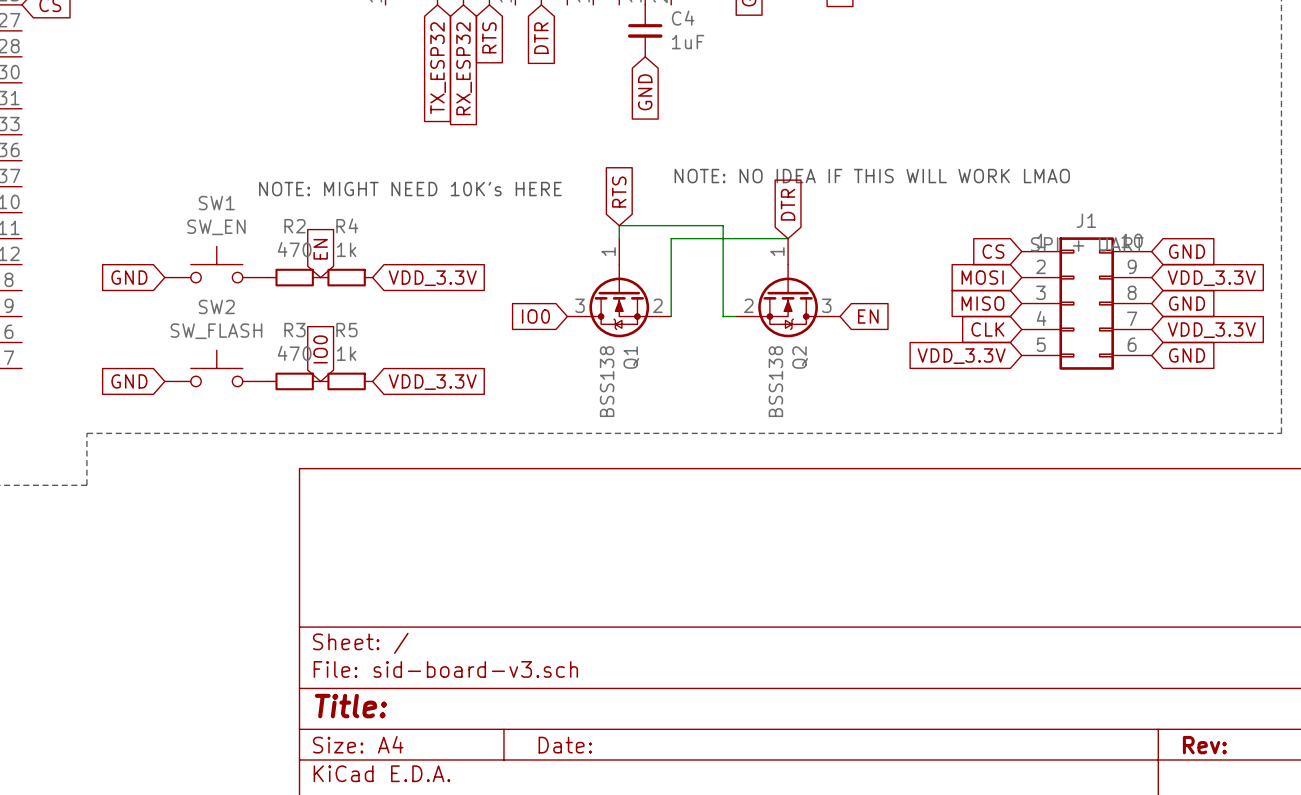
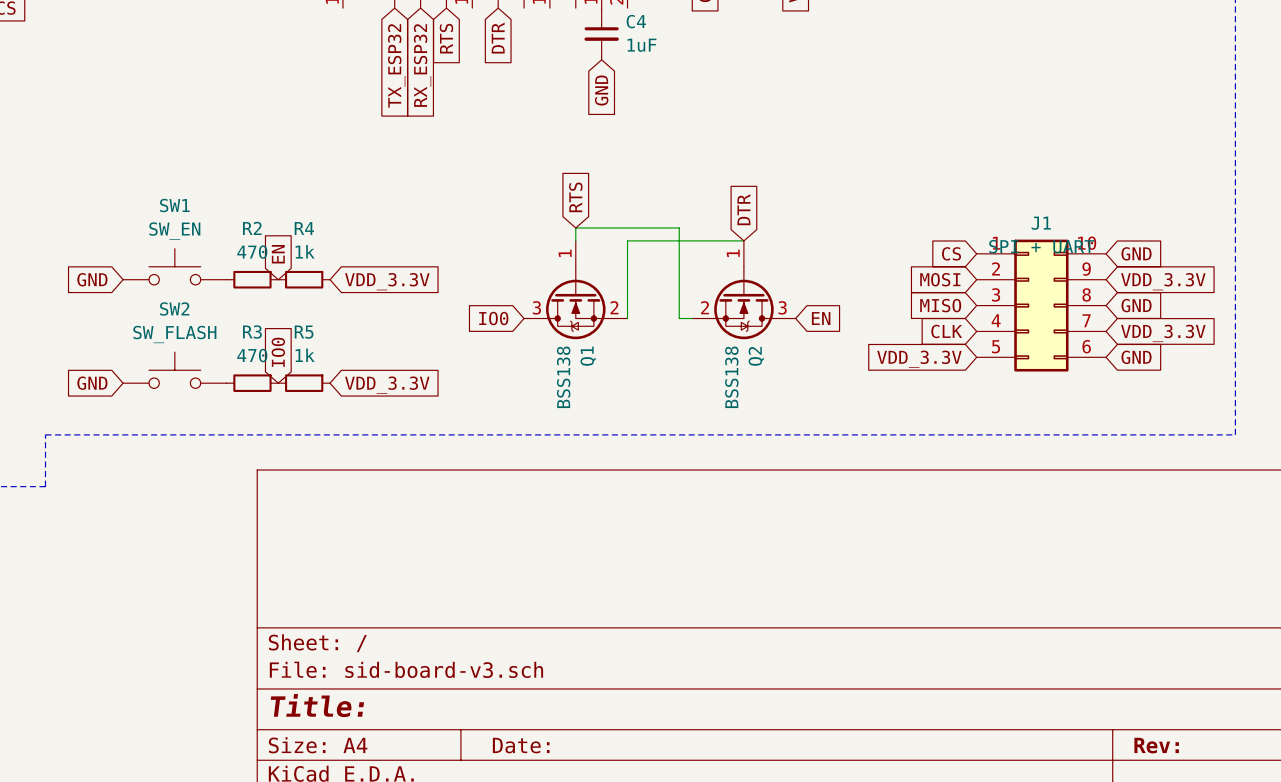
text: NOTE: NO IDEA IF THIS WILL WORK LMAO (872, 176) -> none
text: NOTE: MIGHT NEED 10K's HERE (410, 189) -> none

